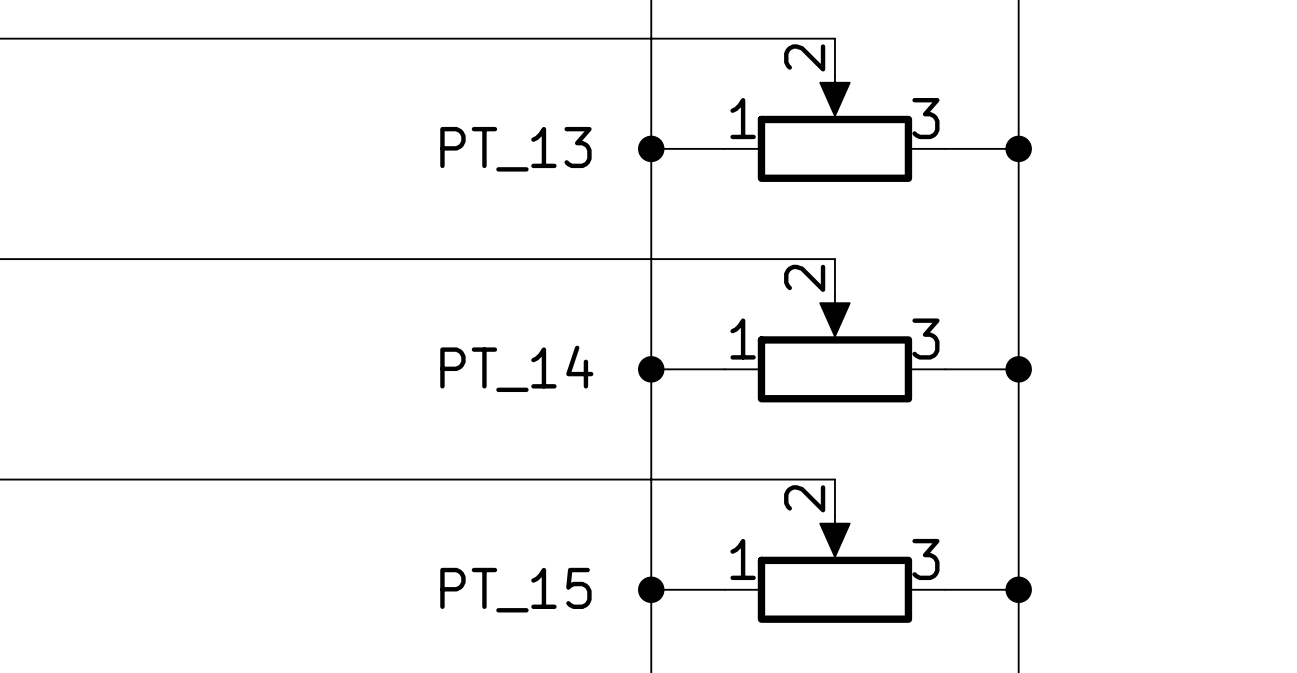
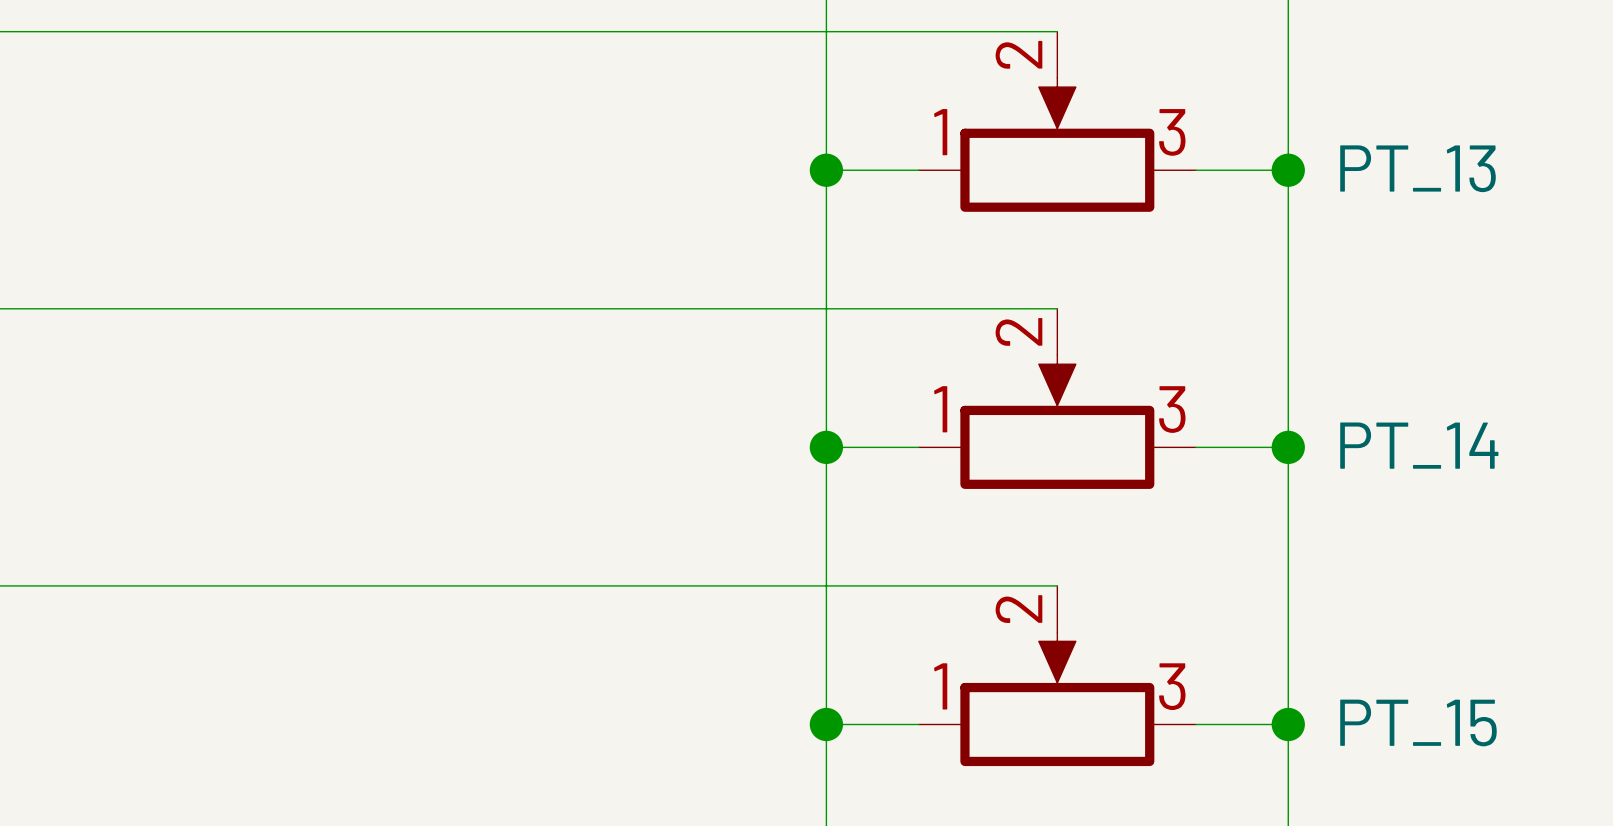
PT_13 name position: PT_13 (515, 149) -> PT_13 (1418, 168)
PT_14 name position: PT_14 (516, 368) -> PT_14 (1419, 445)
PT_15 name position: PT_15 (515, 590) -> PT_15 (1418, 722)

